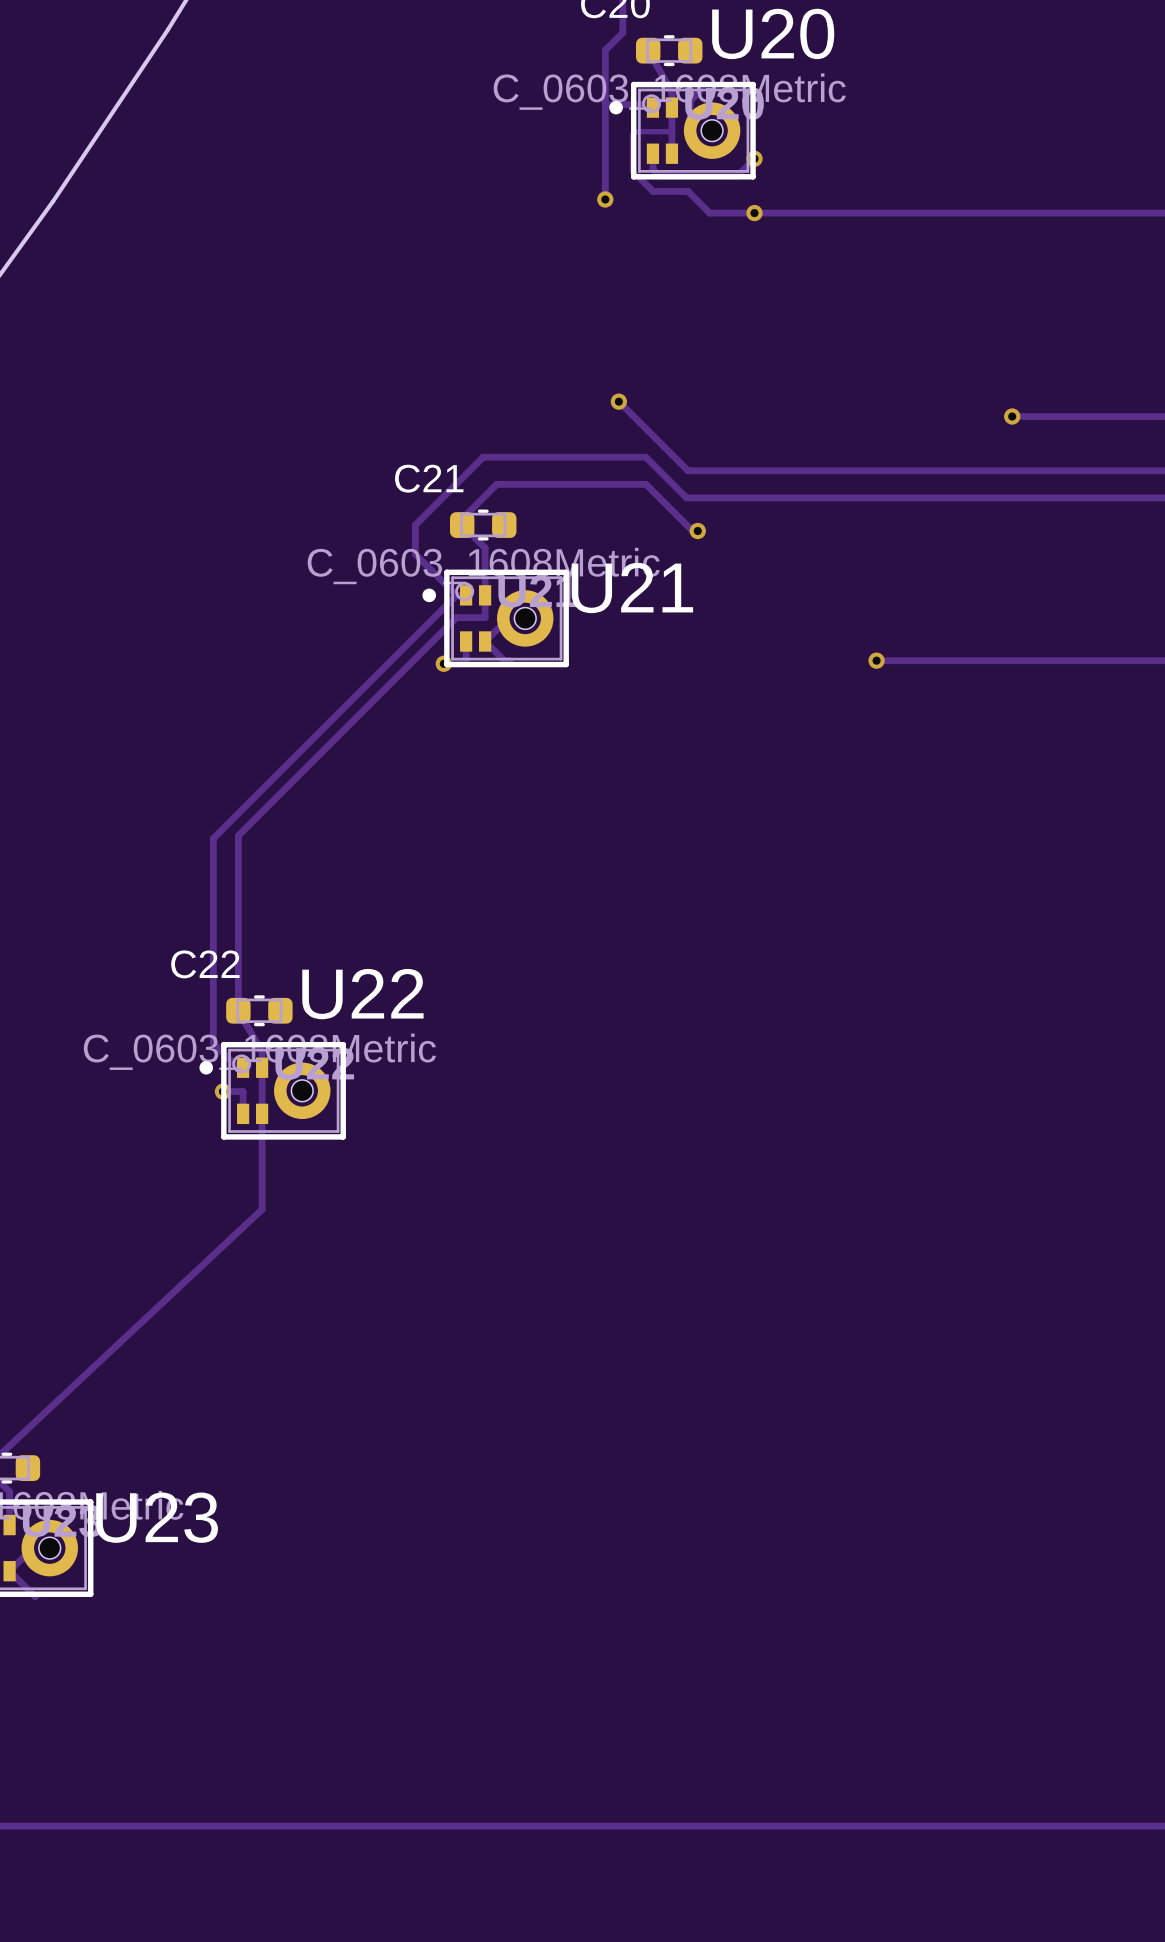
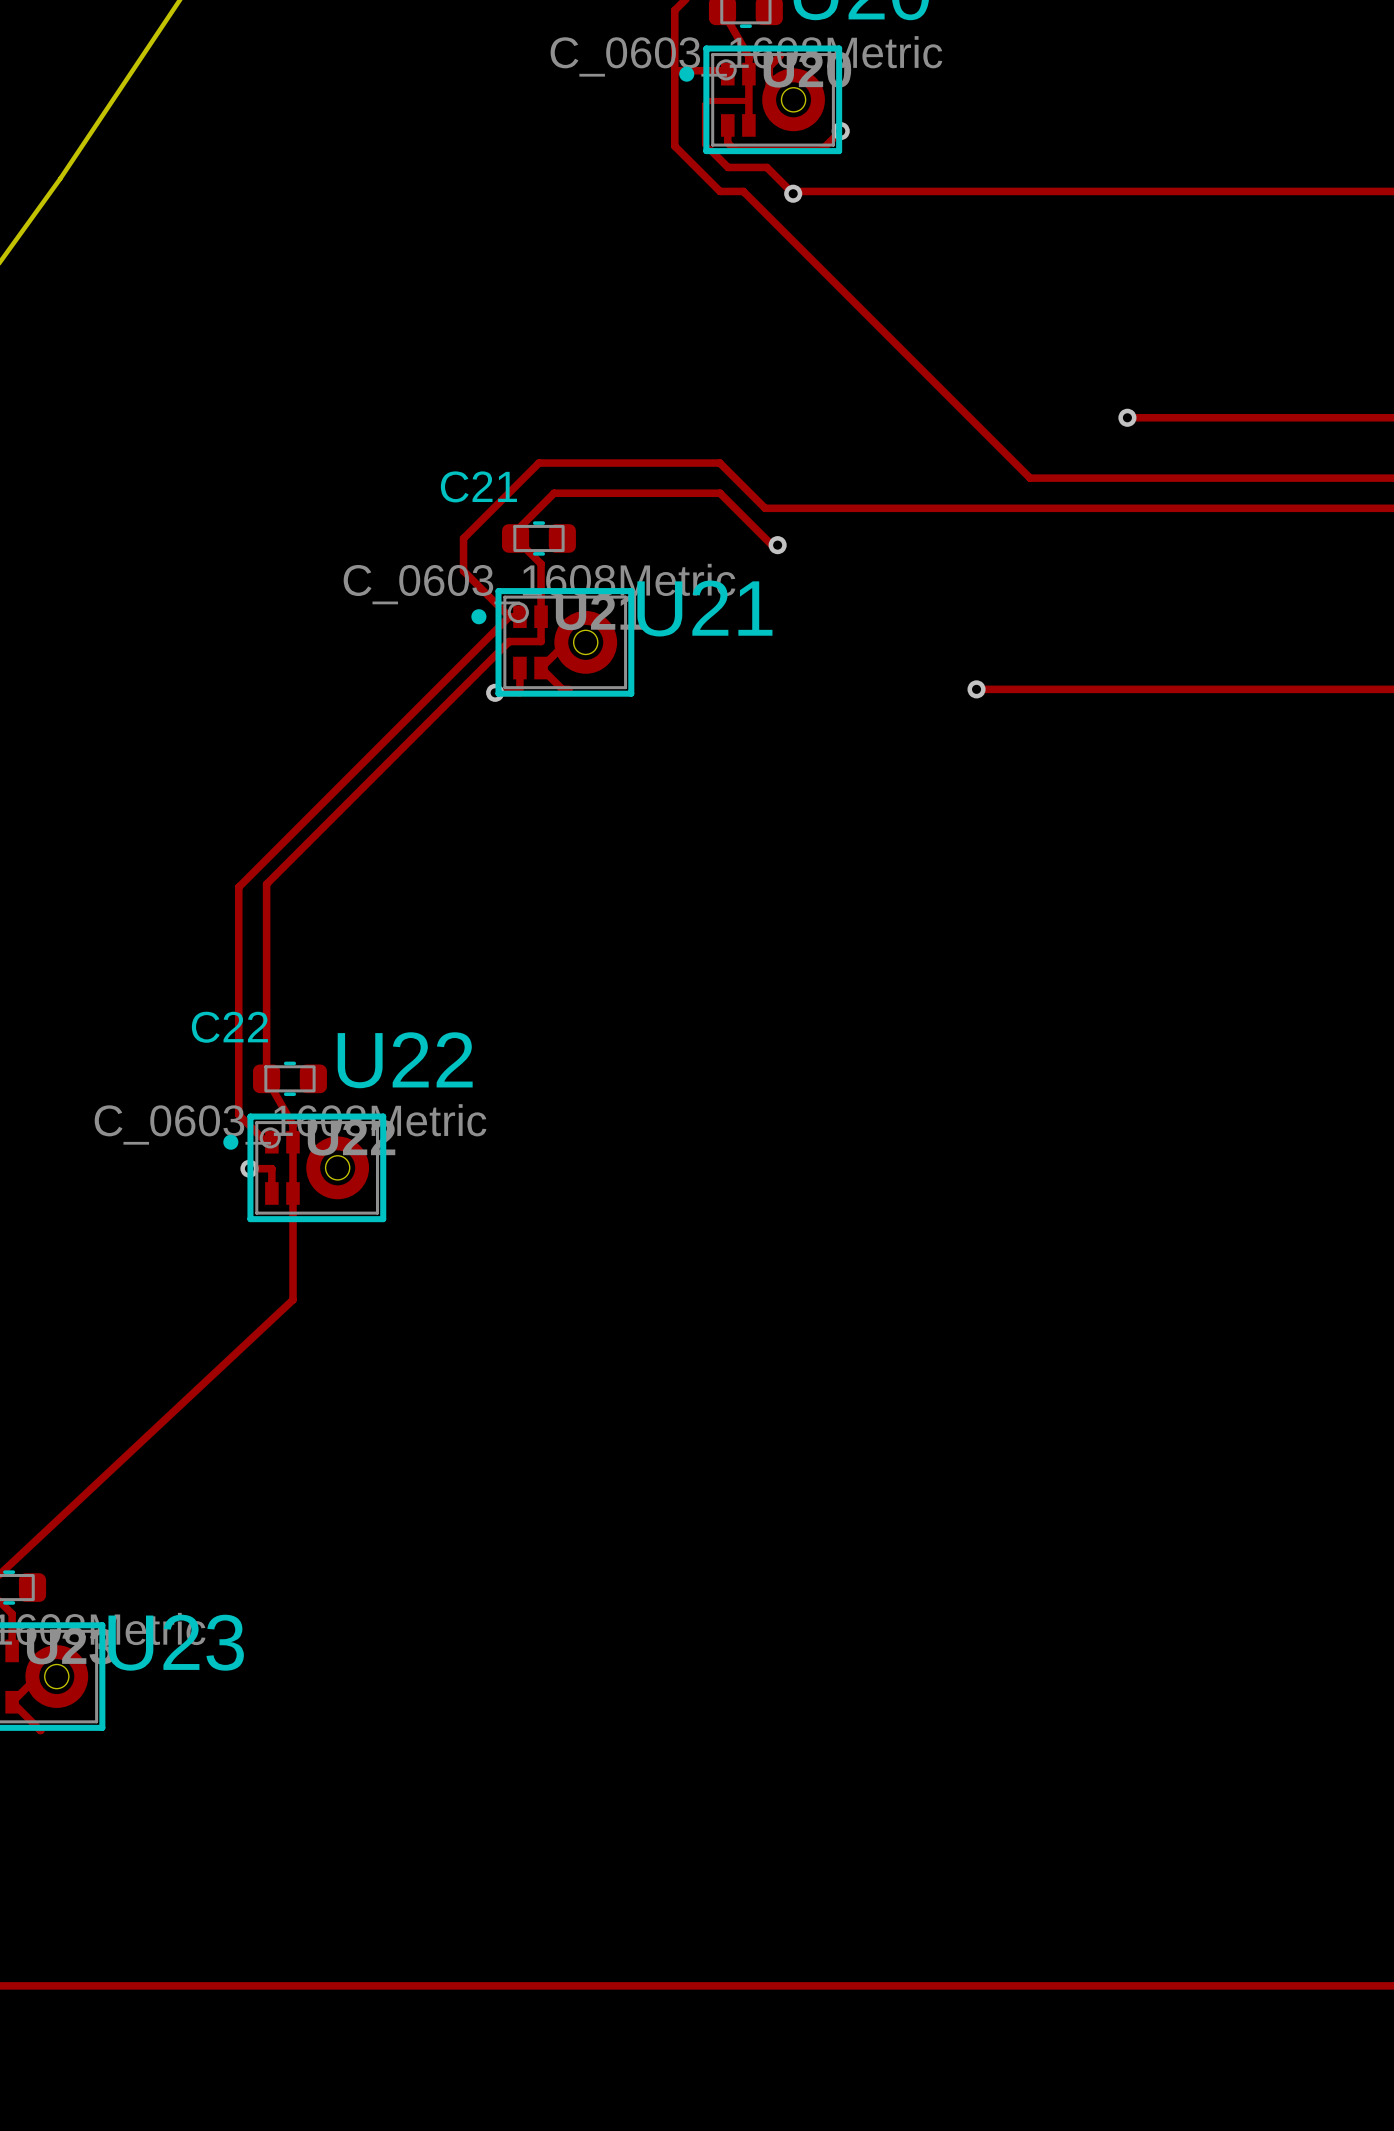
track: (605, 172) (605, 199) -> none
via: (605, 199) -> none
via position: (754, 213) -> (793, 193)
track: (618, 401) (687, 470) (924, 470) -> (674, 146) (720, 191) (743, 191) (1030, 478)
via: (618, 401) -> none

